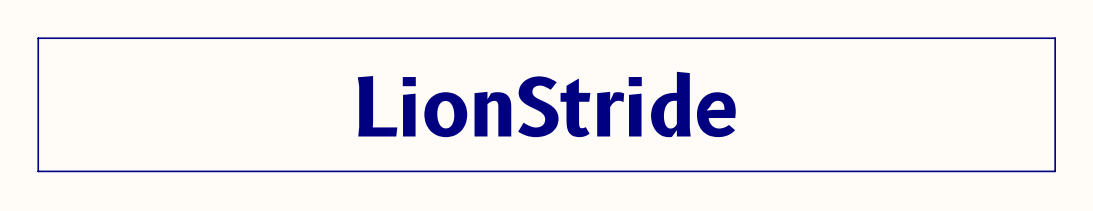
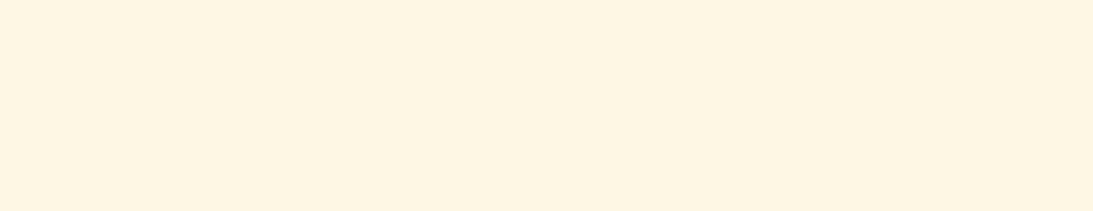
line: (38, 38) (1055, 38) (1055, 171) (38, 171) (38, 38) -> none
text: LionStride (546, 104) -> none

